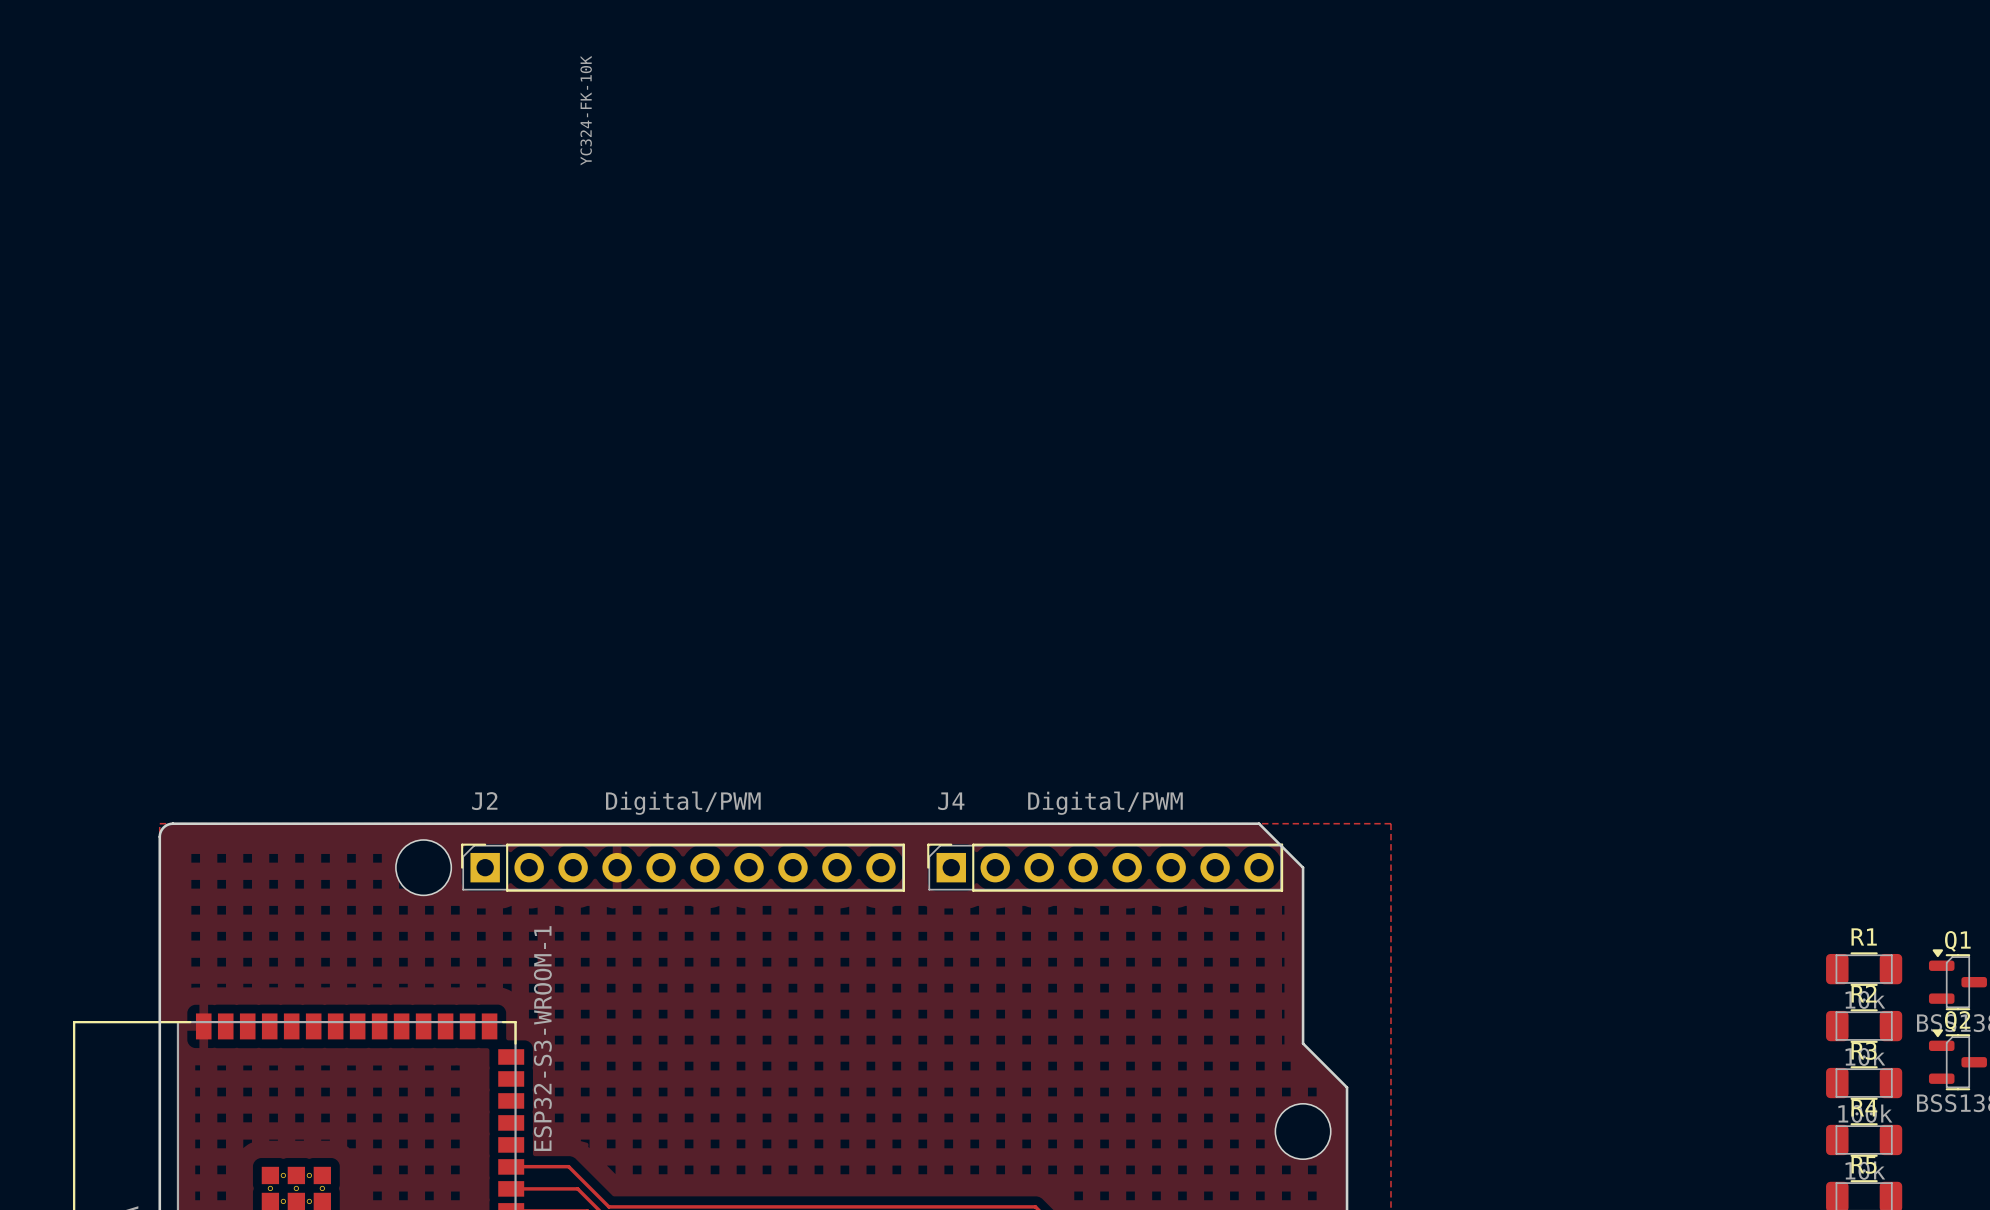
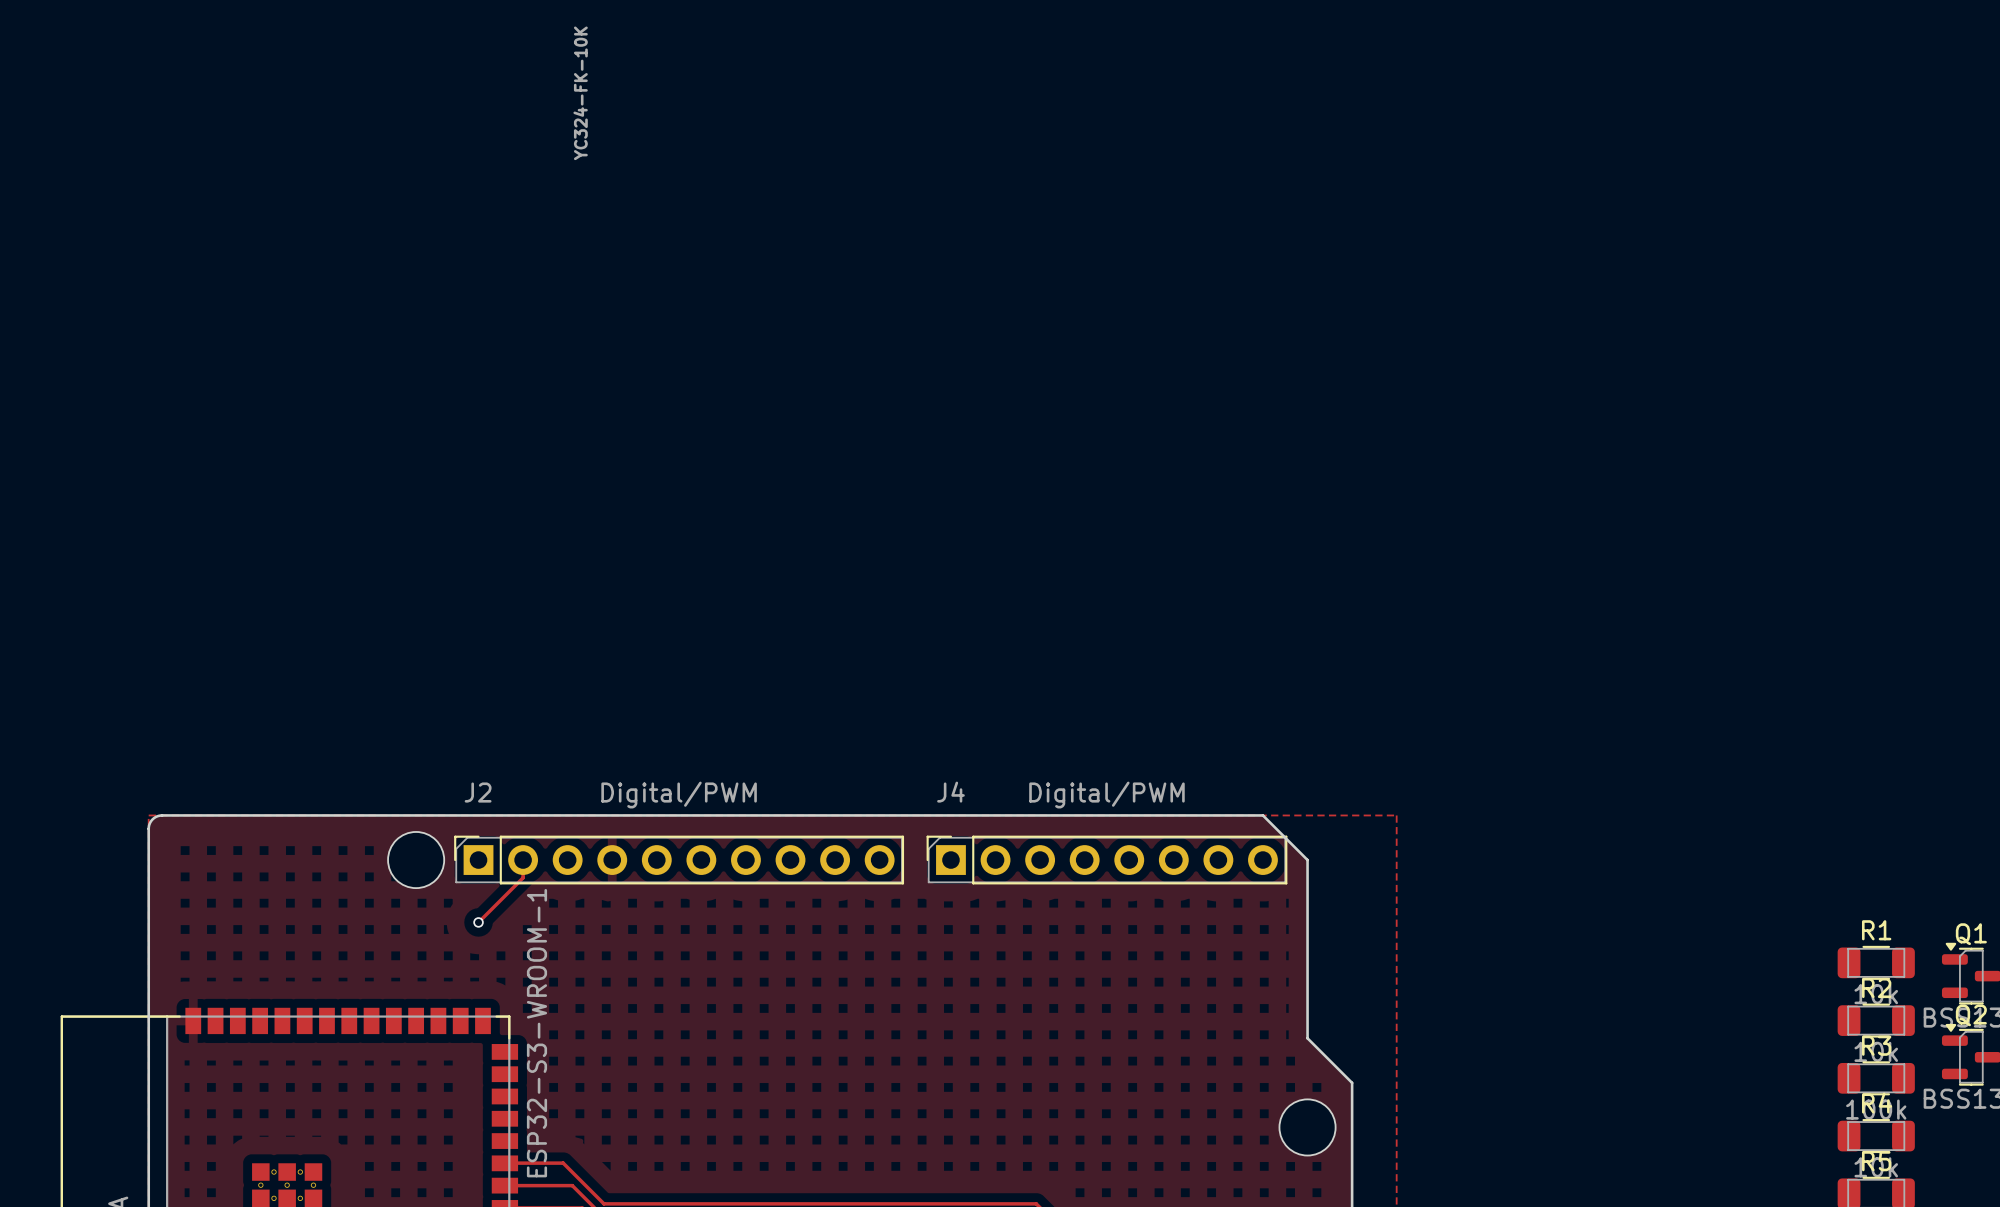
track: none -> (523, 860) (523, 877) (478, 922)
via: none -> (478, 922)

